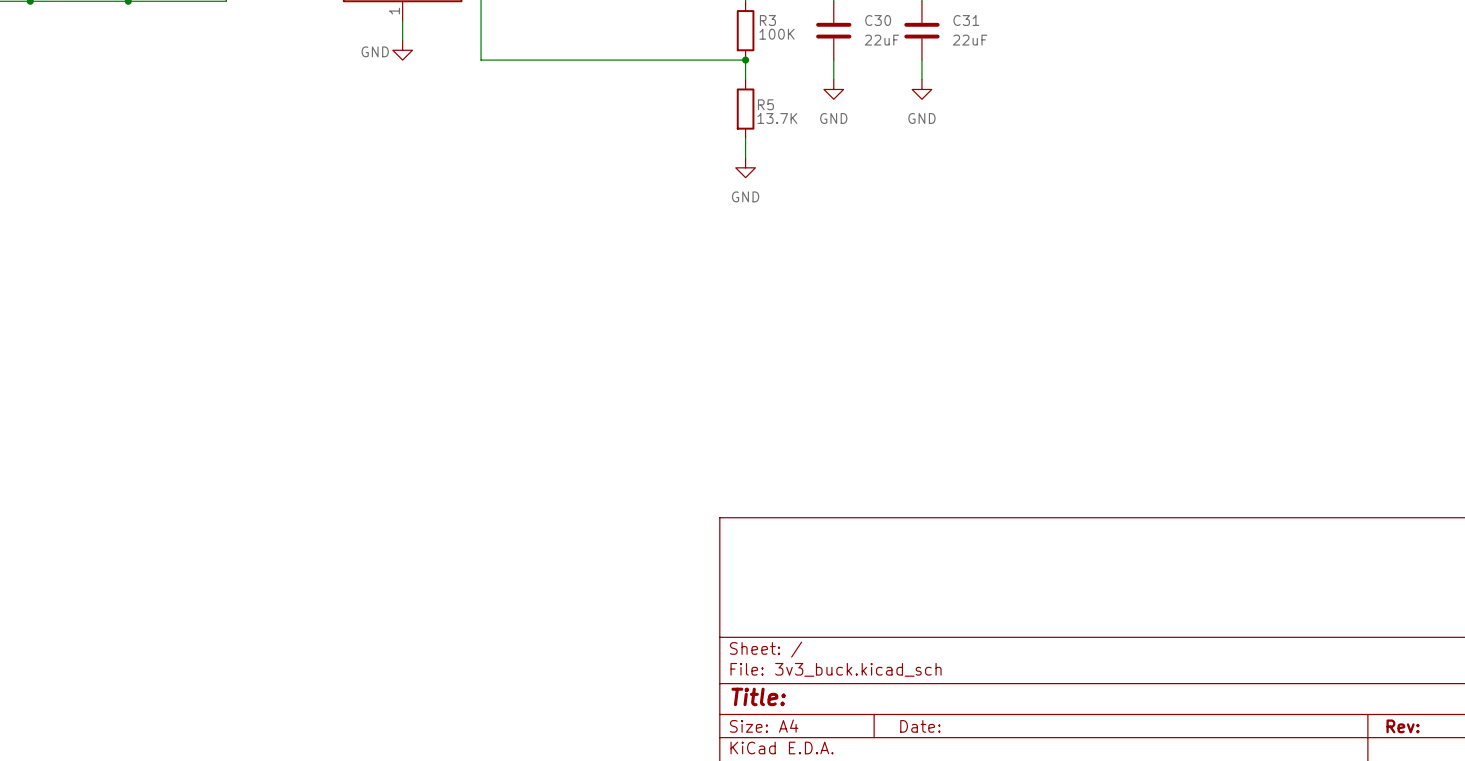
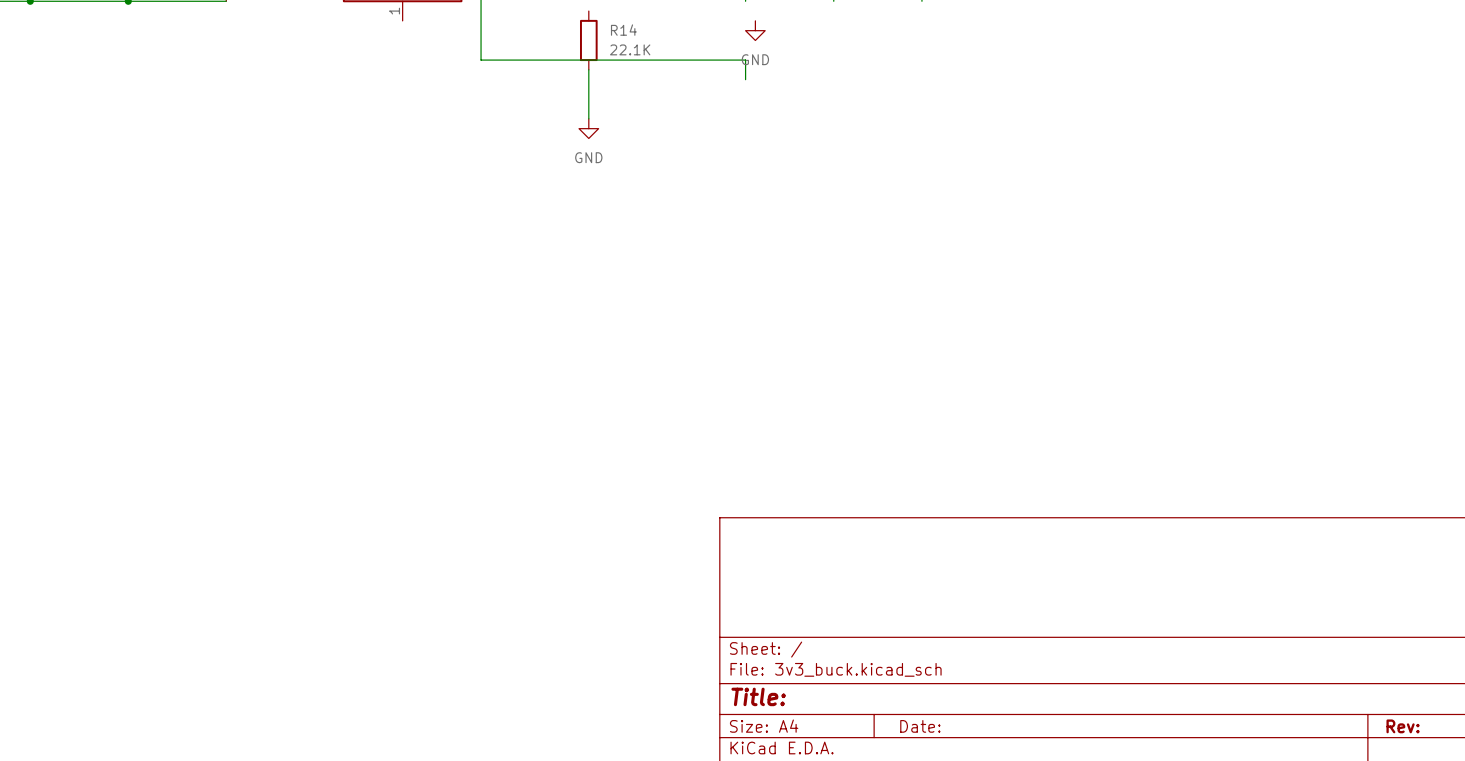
wire: (402, 20) (402, 40) -> none
R3: 100K (745, 30) -> none
power symbol: none -> GND (755, 30)
C30: 22uF (833, 30) -> none
C31: 22uF (921, 30) -> none
R14: none -> 22.1K (588, 40)
power symbol: GND (402, 50) -> none
junction: (745, 60) -> none
wire: (833, 60) (833, 79) -> none
wire: (921, 60) (921, 79) -> none
wire: none -> (588, 69) (588, 118)
power symbol: GND (833, 89) -> none
power symbol: GND (921, 89) -> none
R5: 13.7K (745, 109) -> none
power symbol: none -> GND (588, 128)
wire: (745, 138) (745, 158) -> none
power symbol: GND (745, 167) -> none

